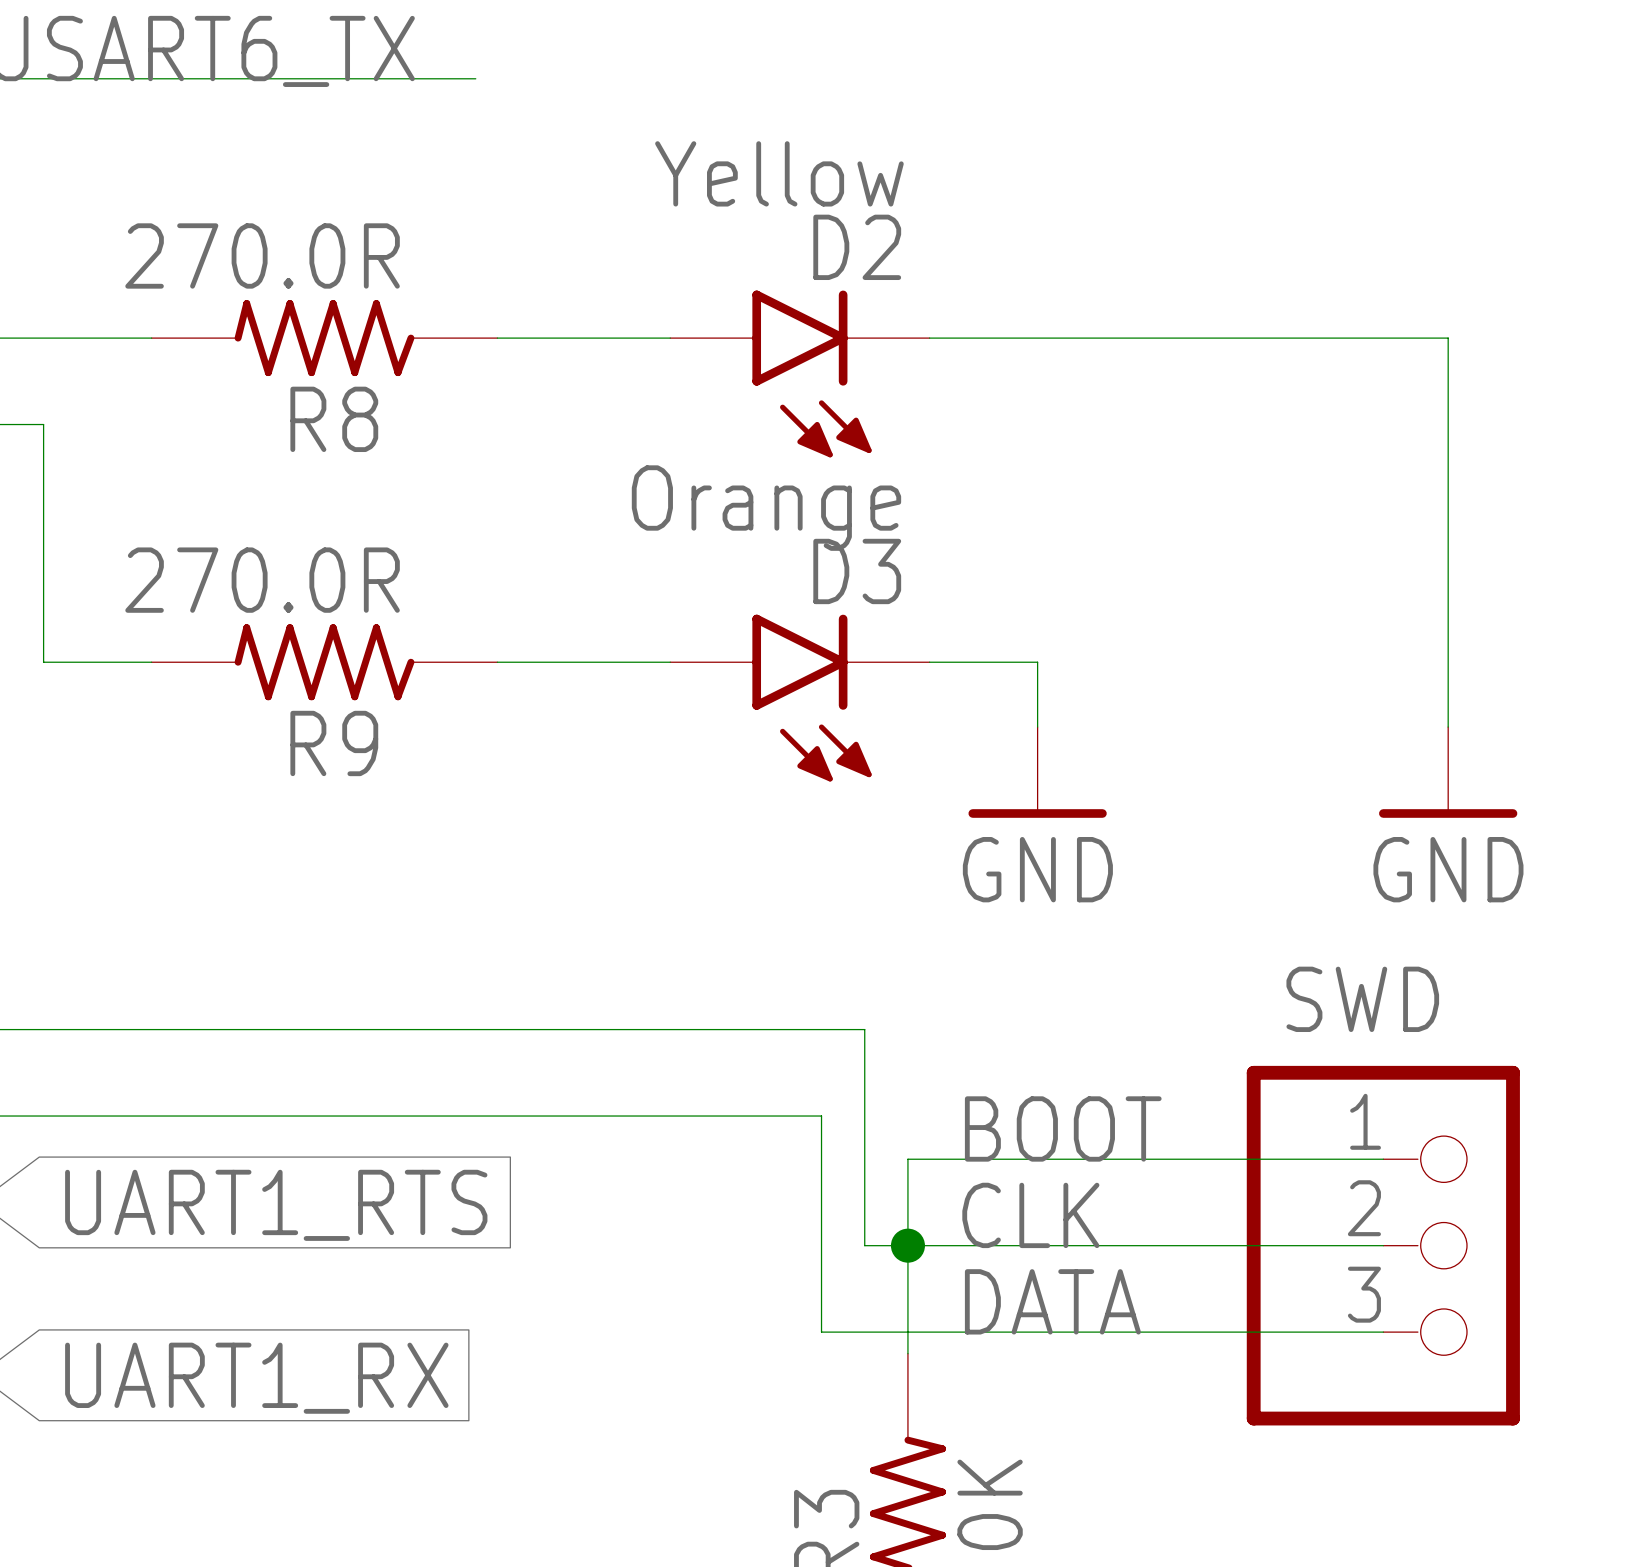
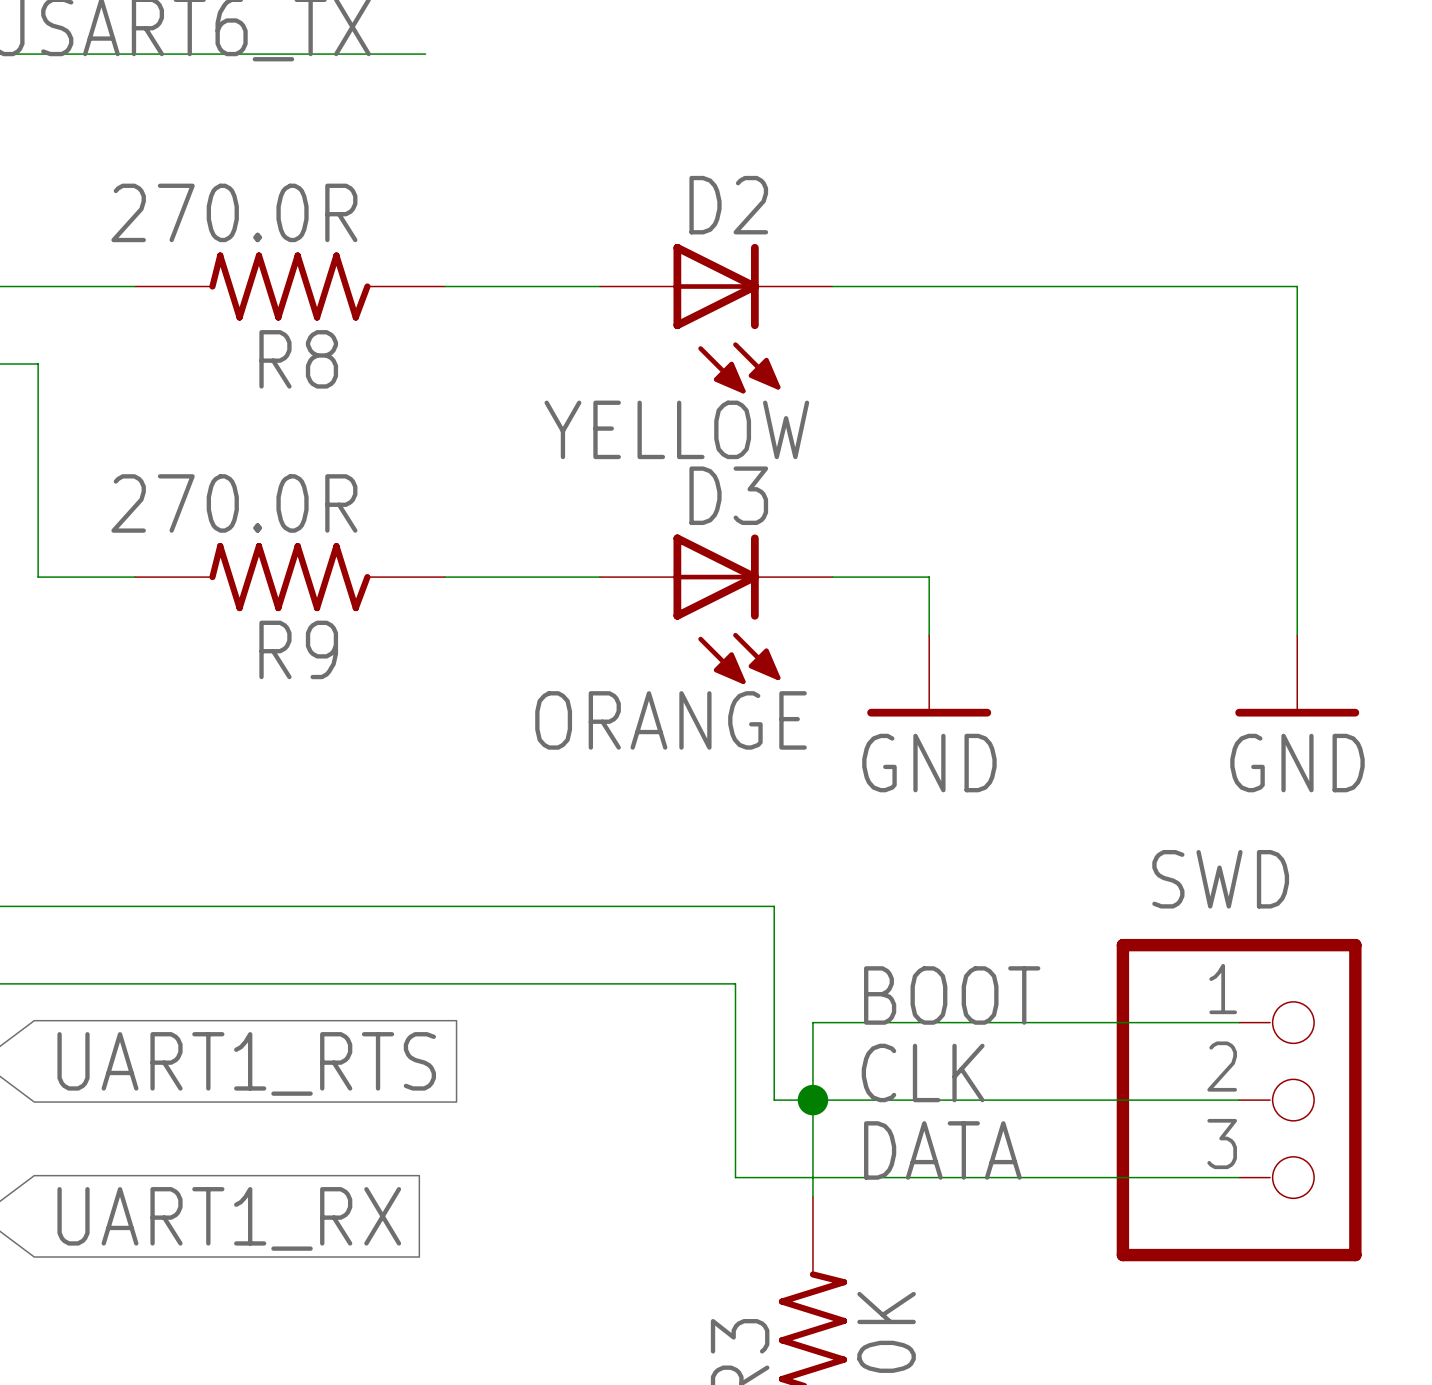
D2 value: Yellow (779, 173) -> YELLOW (676, 429)
D2 name position: D2 (857, 247) -> D2 (728, 205)
D2 symbol: [670, 290, 930, 458] -> [599, 243, 833, 394]
D3 value: Orange (766, 508) -> ORANGE (671, 720)
D3 name position: D3 (857, 571) -> D3 (728, 495)
D3 symbol: [670, 614, 930, 782] -> [599, 534, 833, 685]

